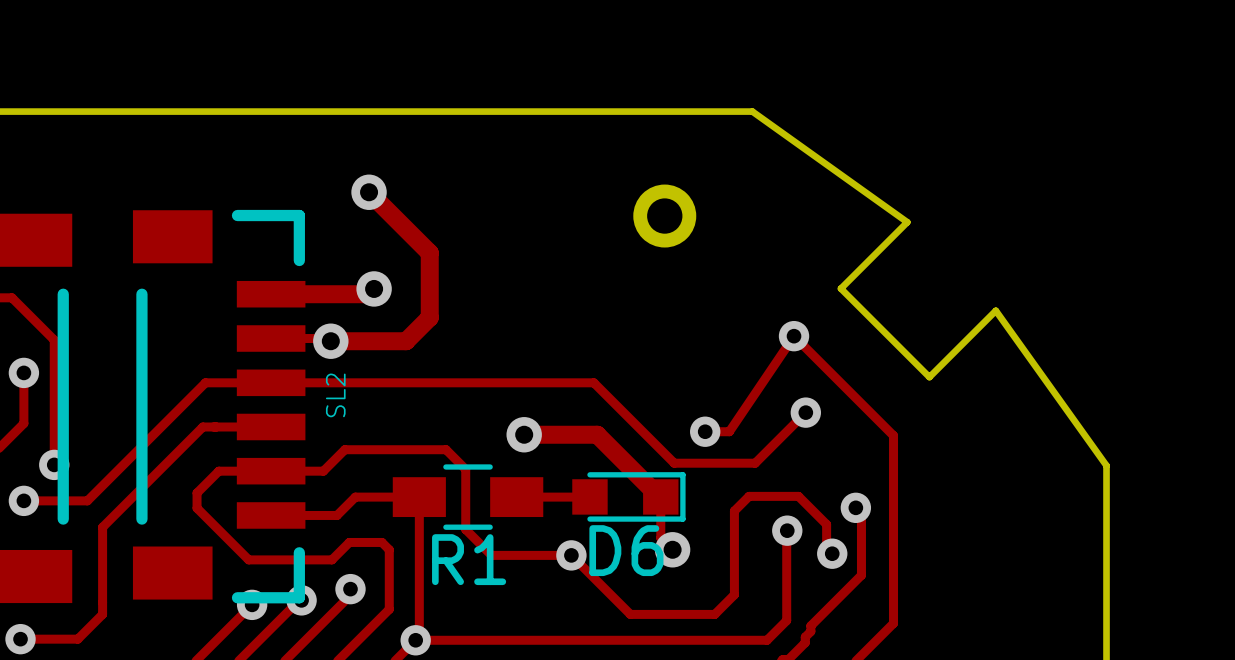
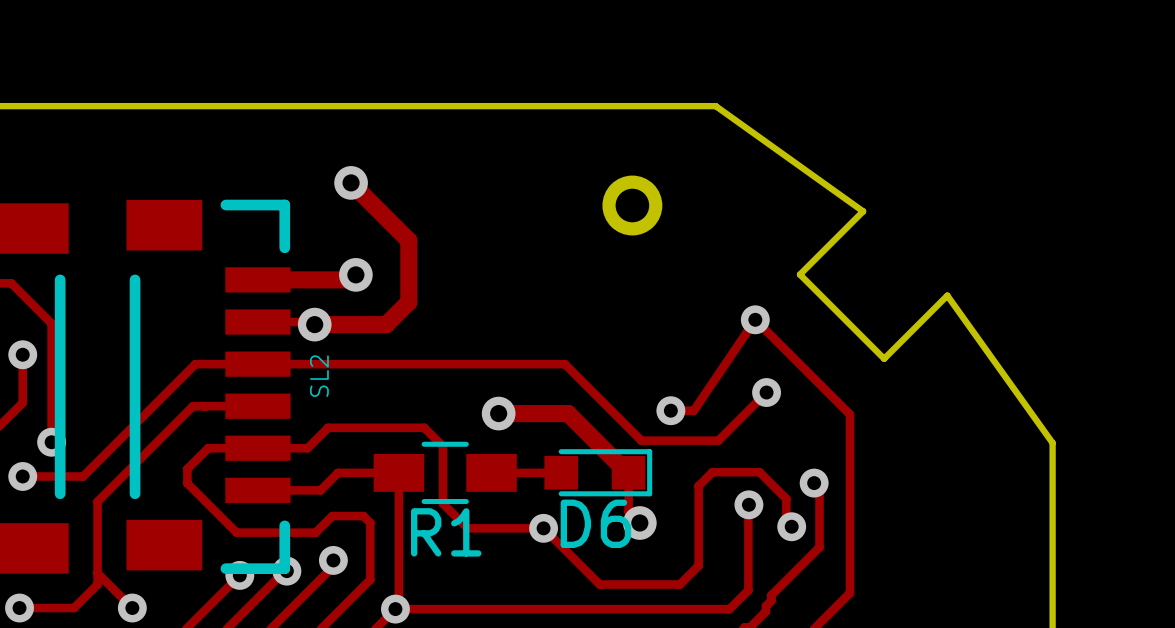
track: none -> (97, 573) (132, 608)
via: none -> (132, 608)

